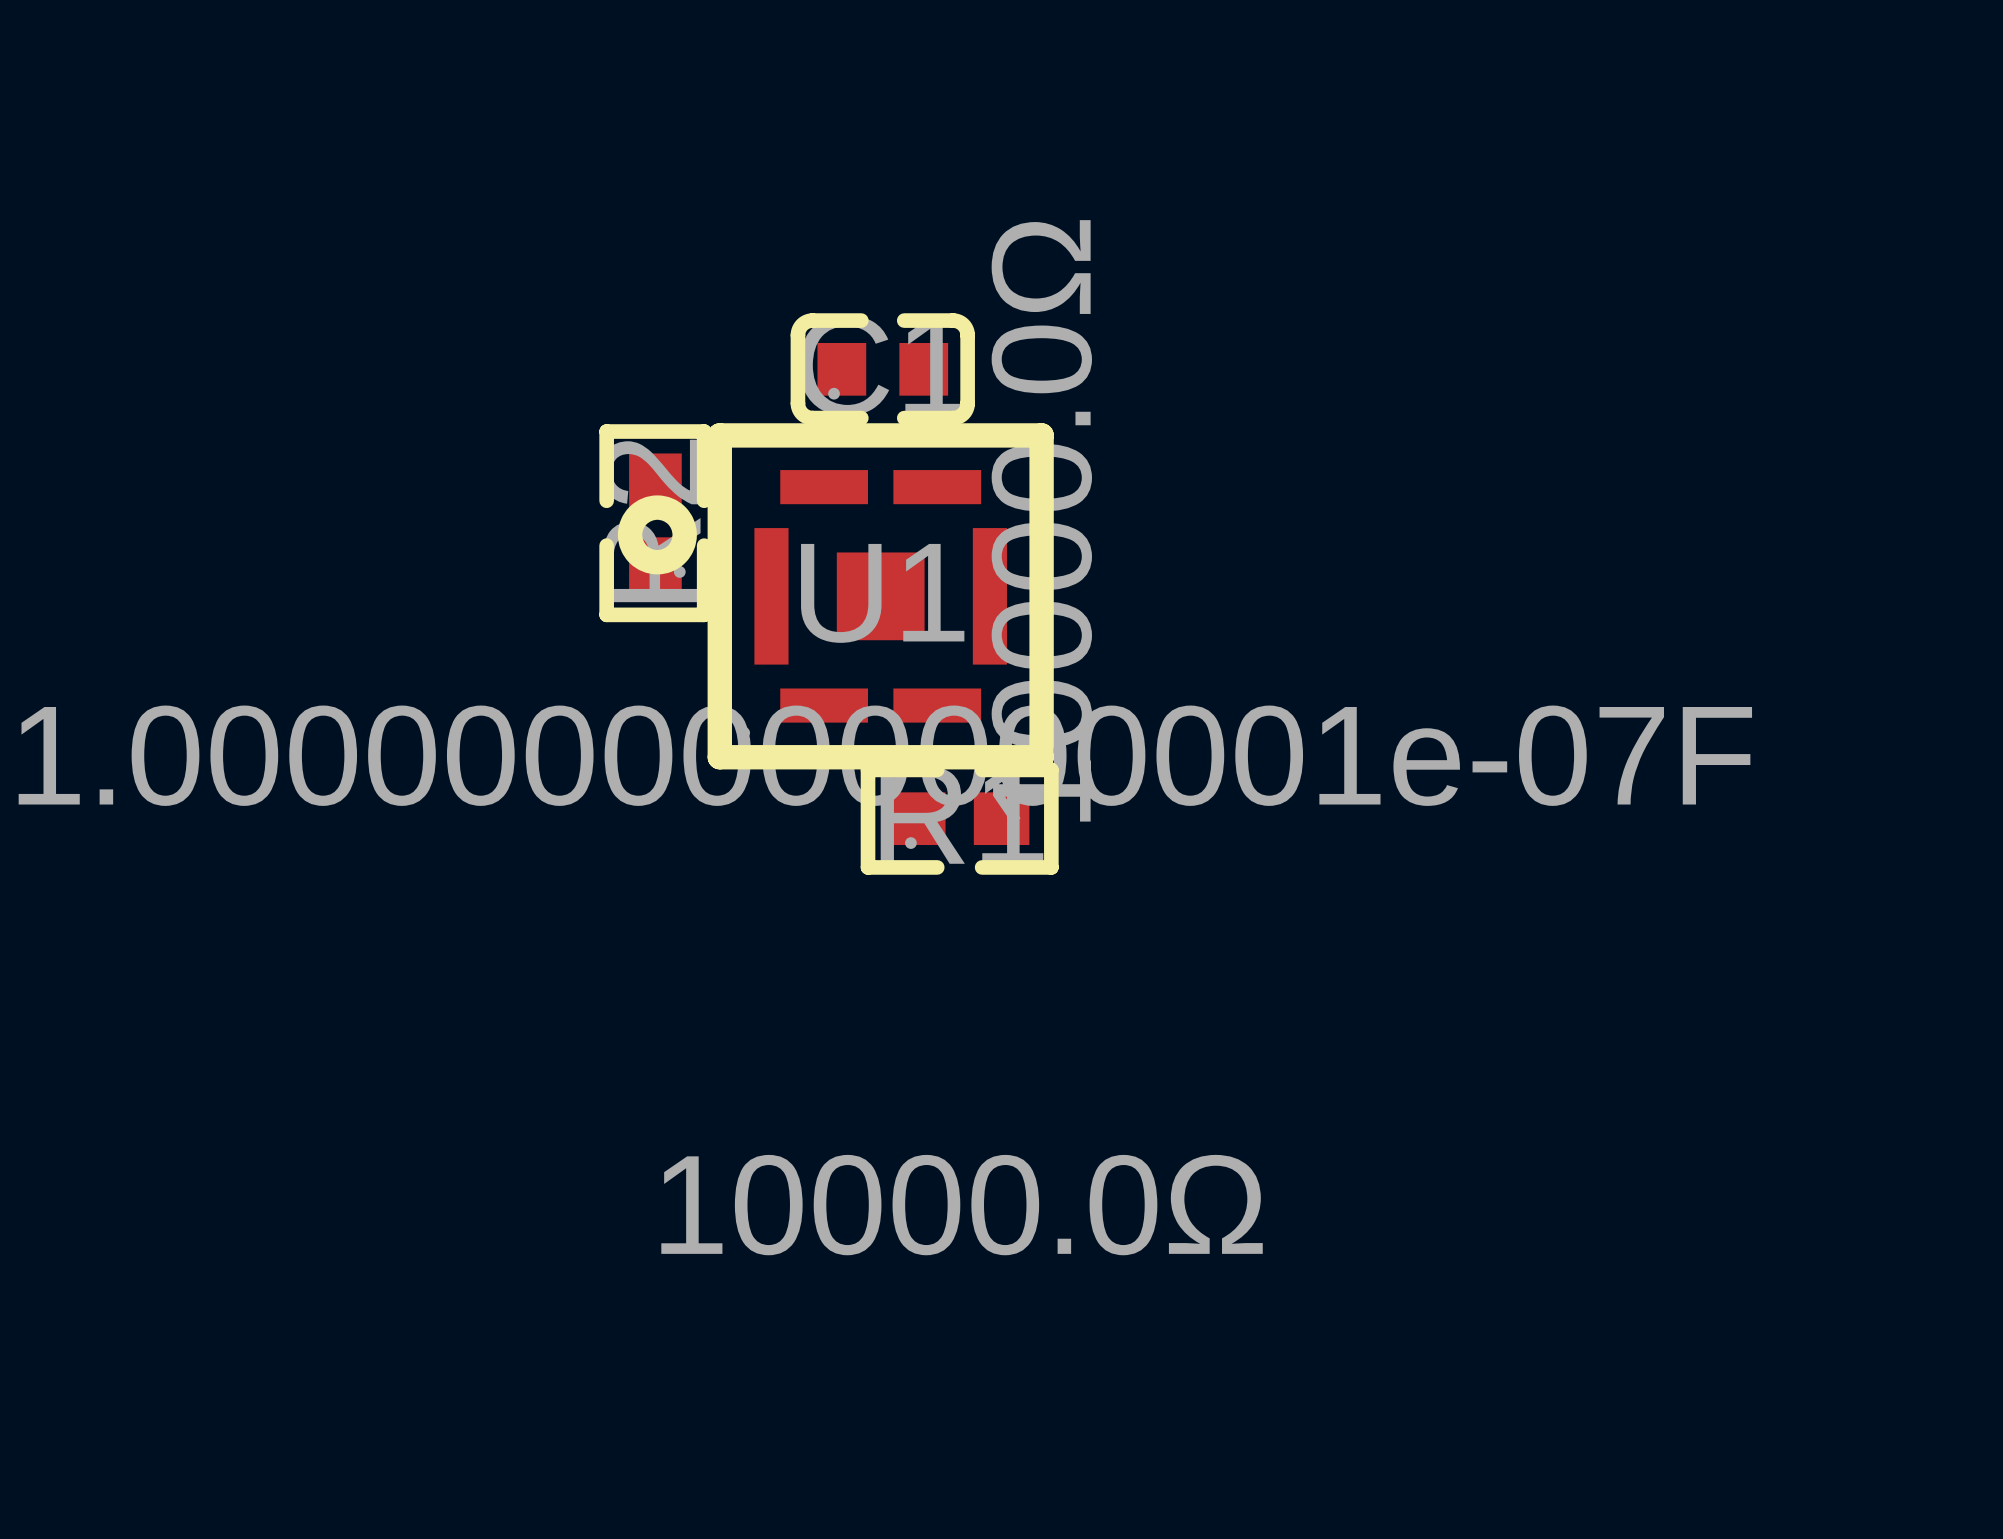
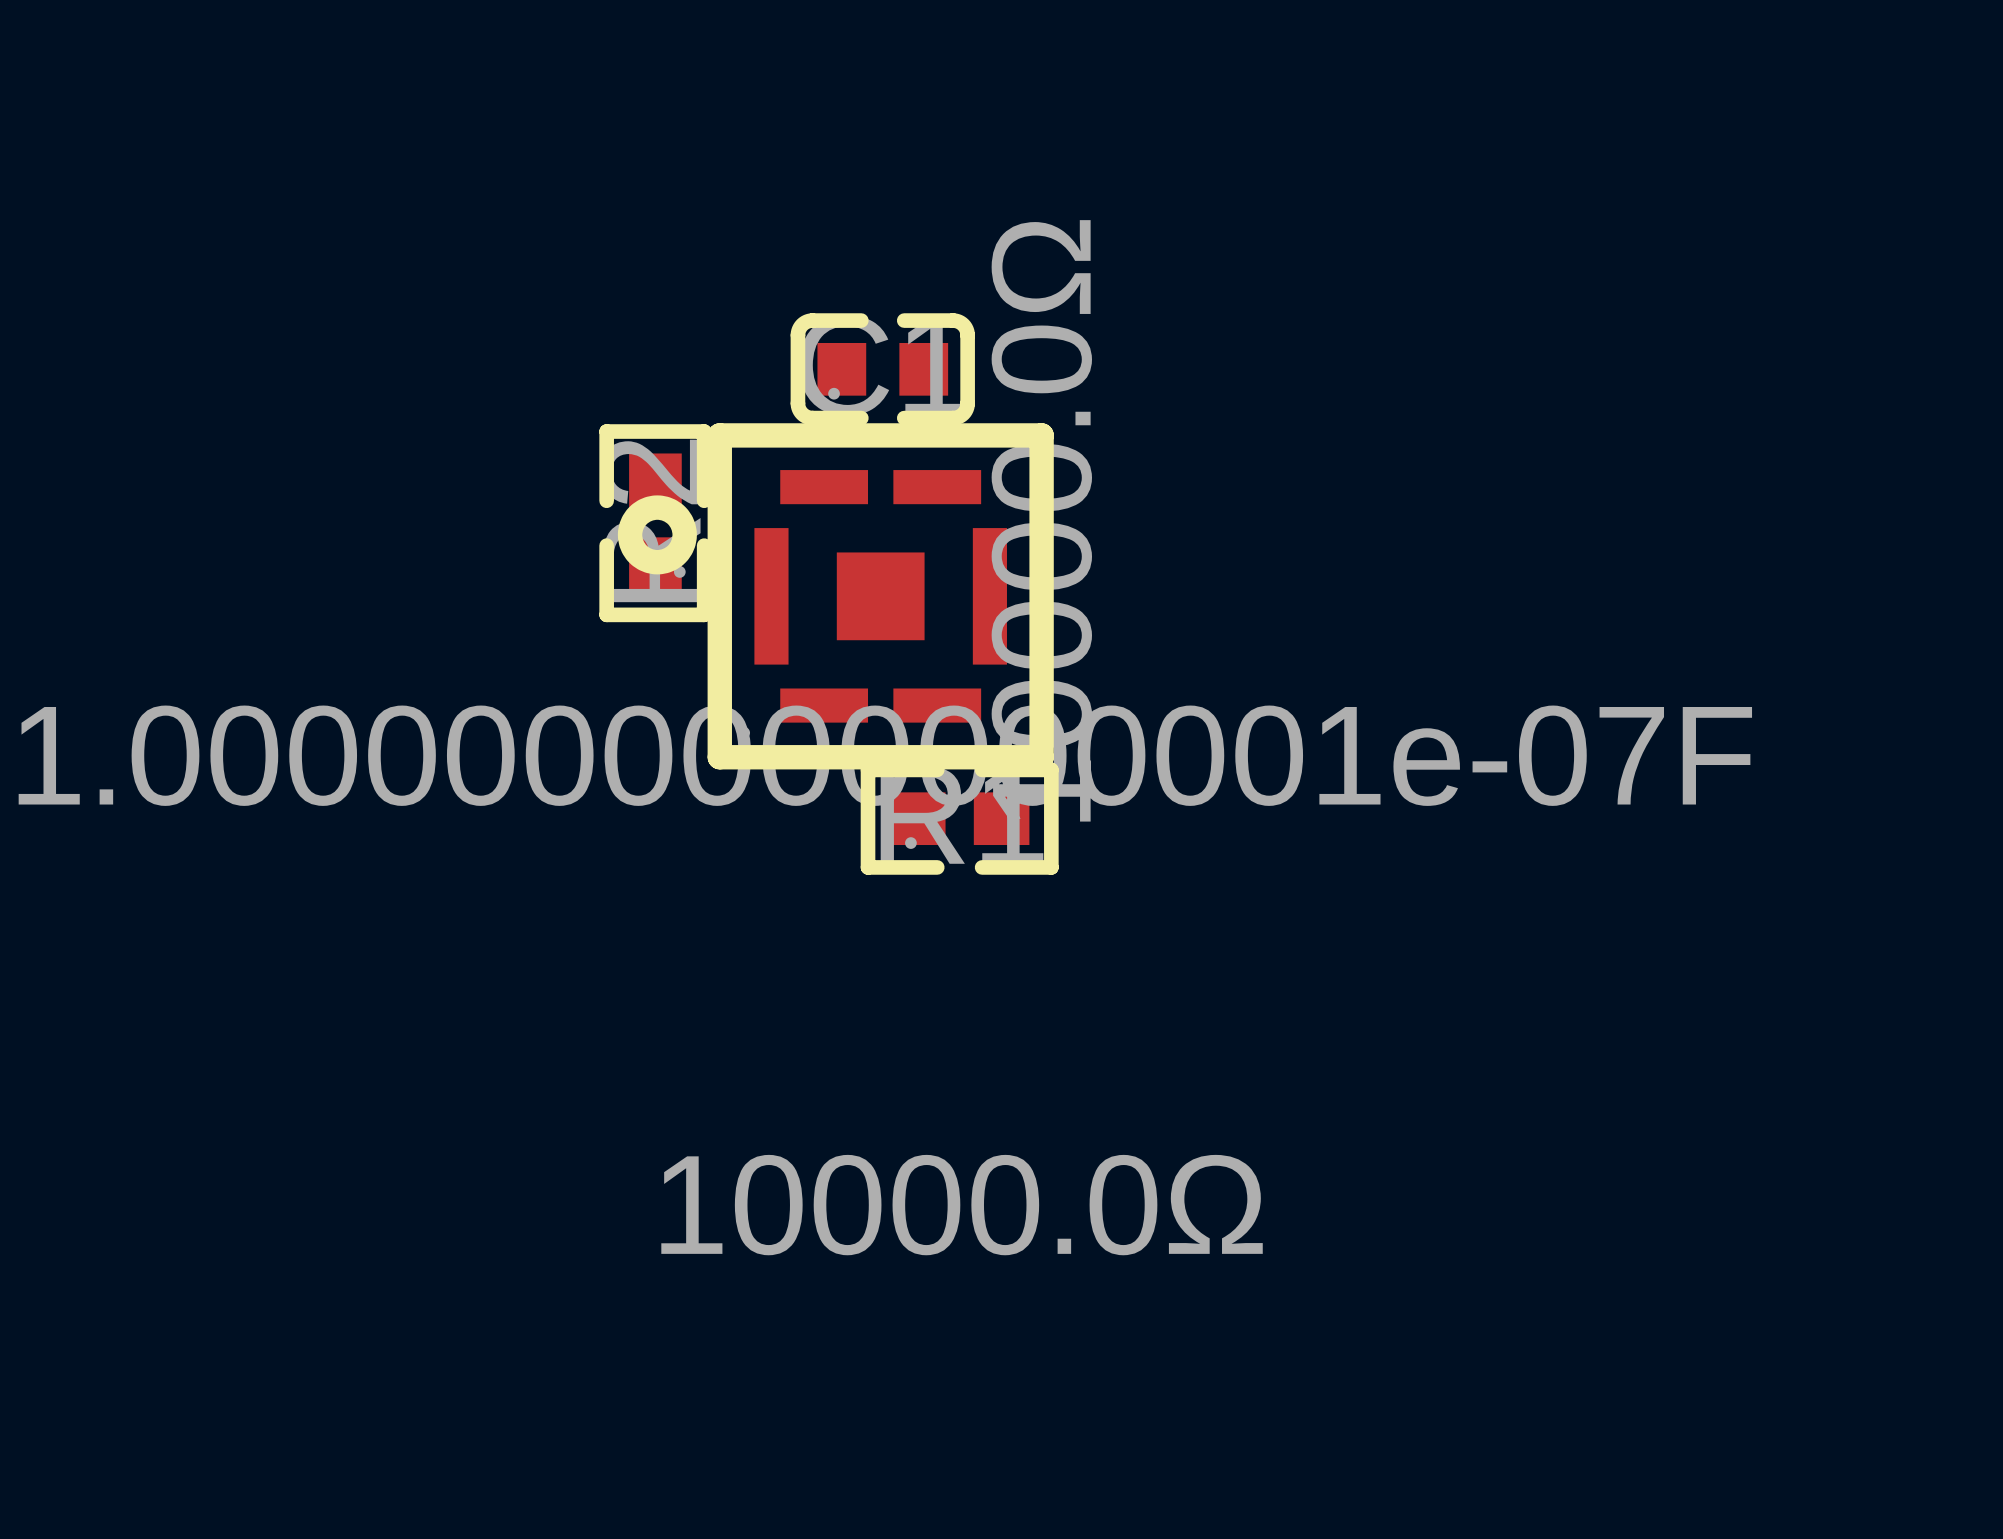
U1 name: U1 (882, 593) -> none

